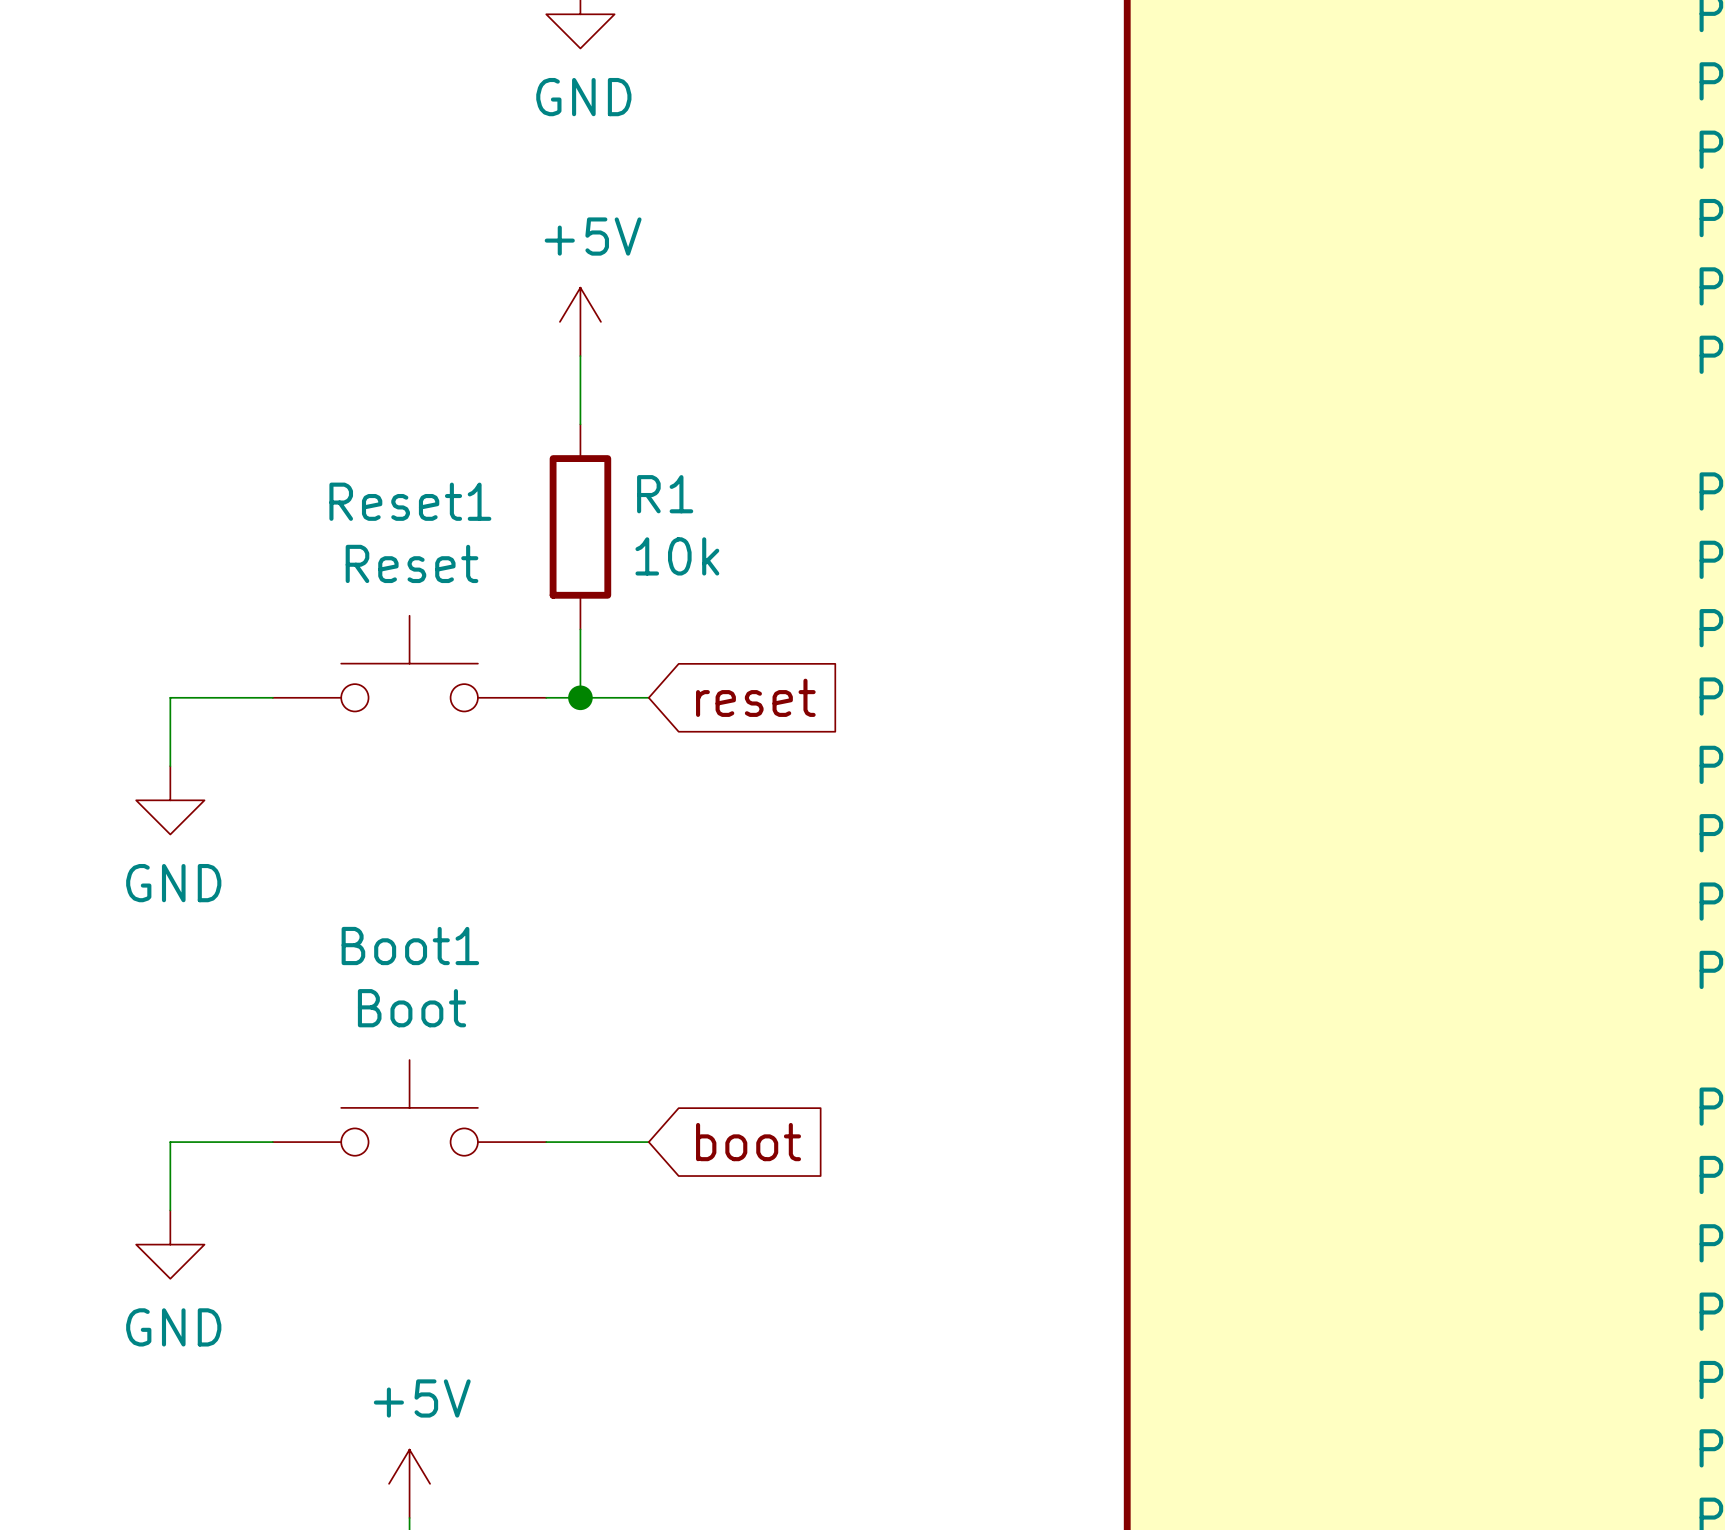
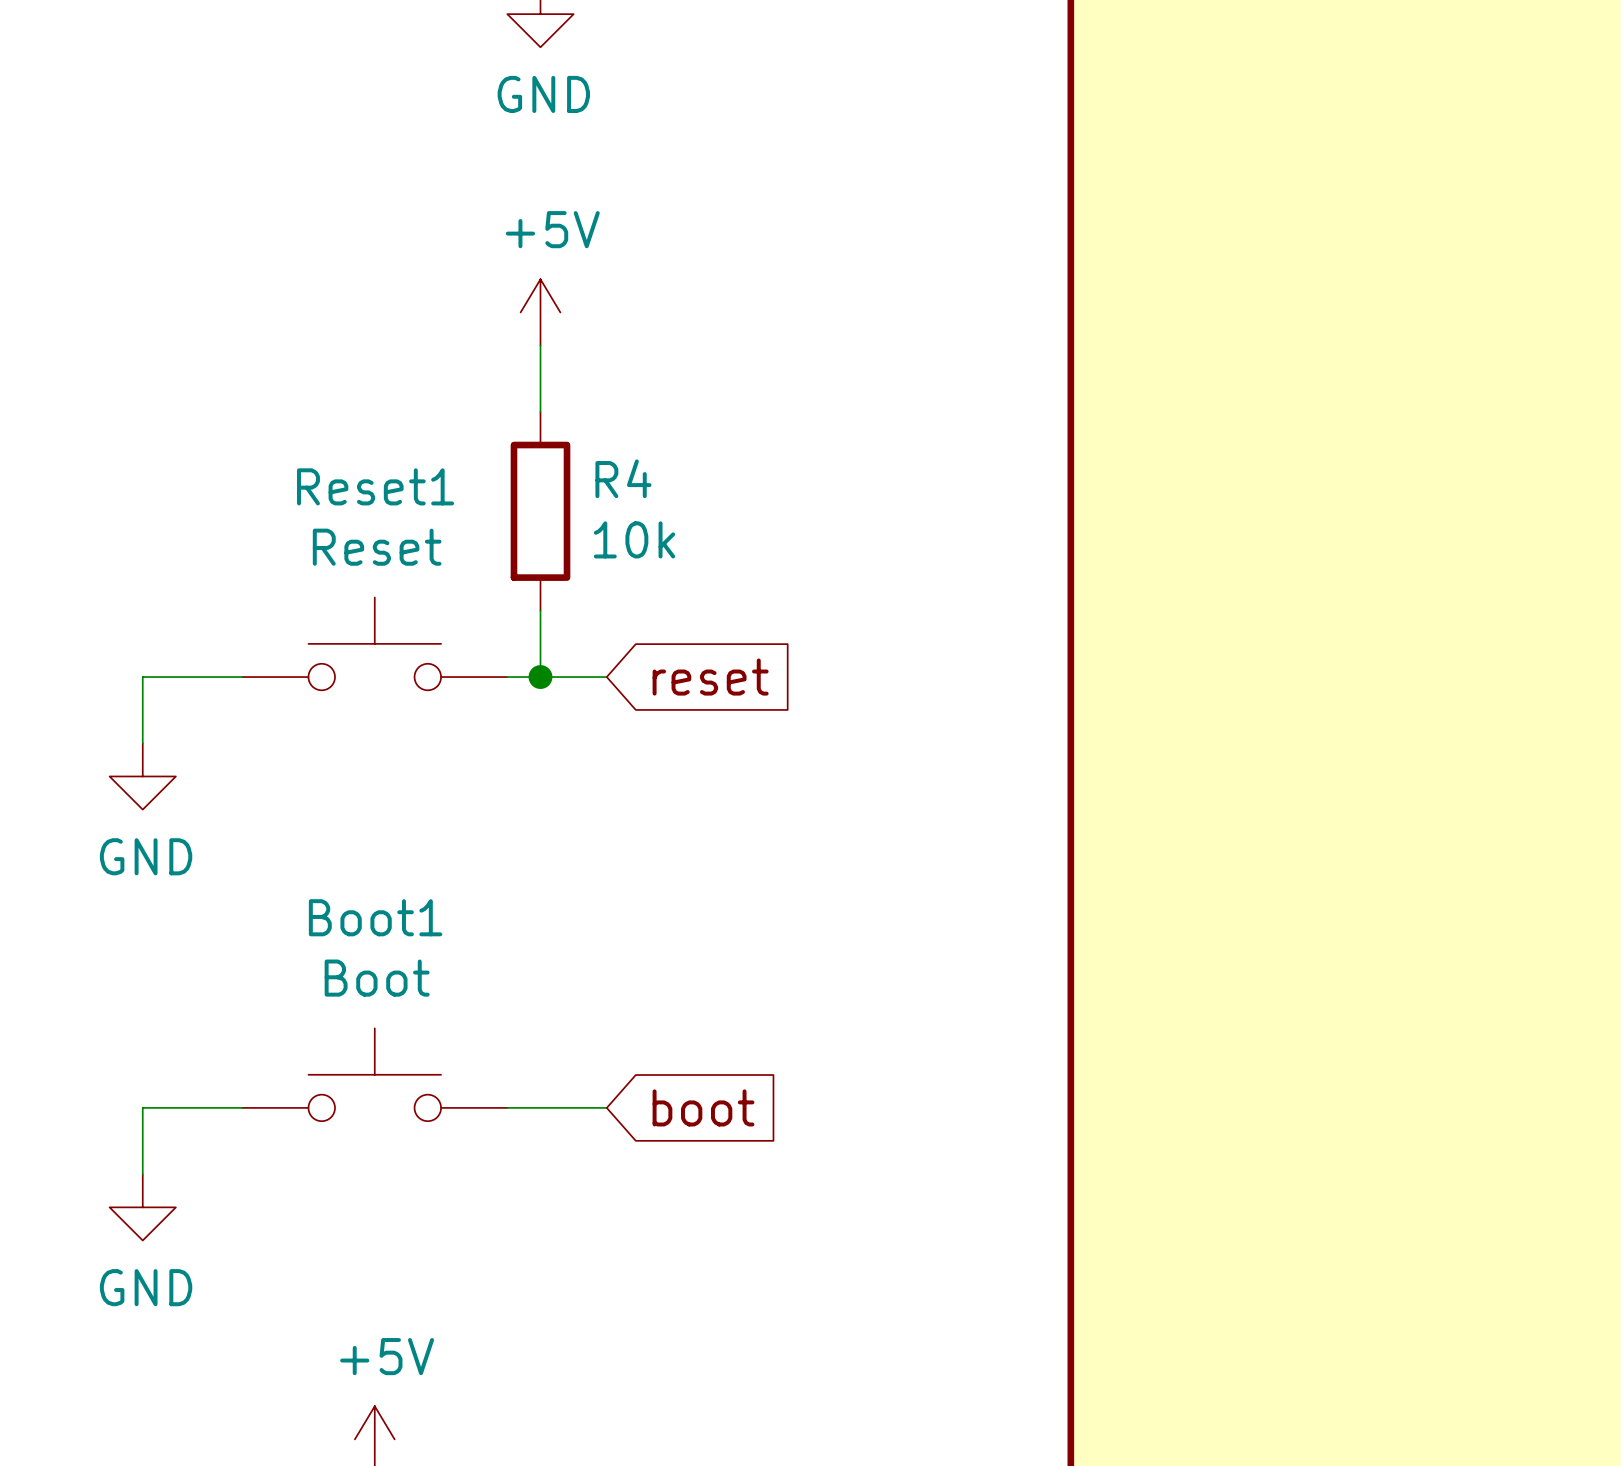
R1 name: R1 (665, 494) -> R4 (623, 478)

